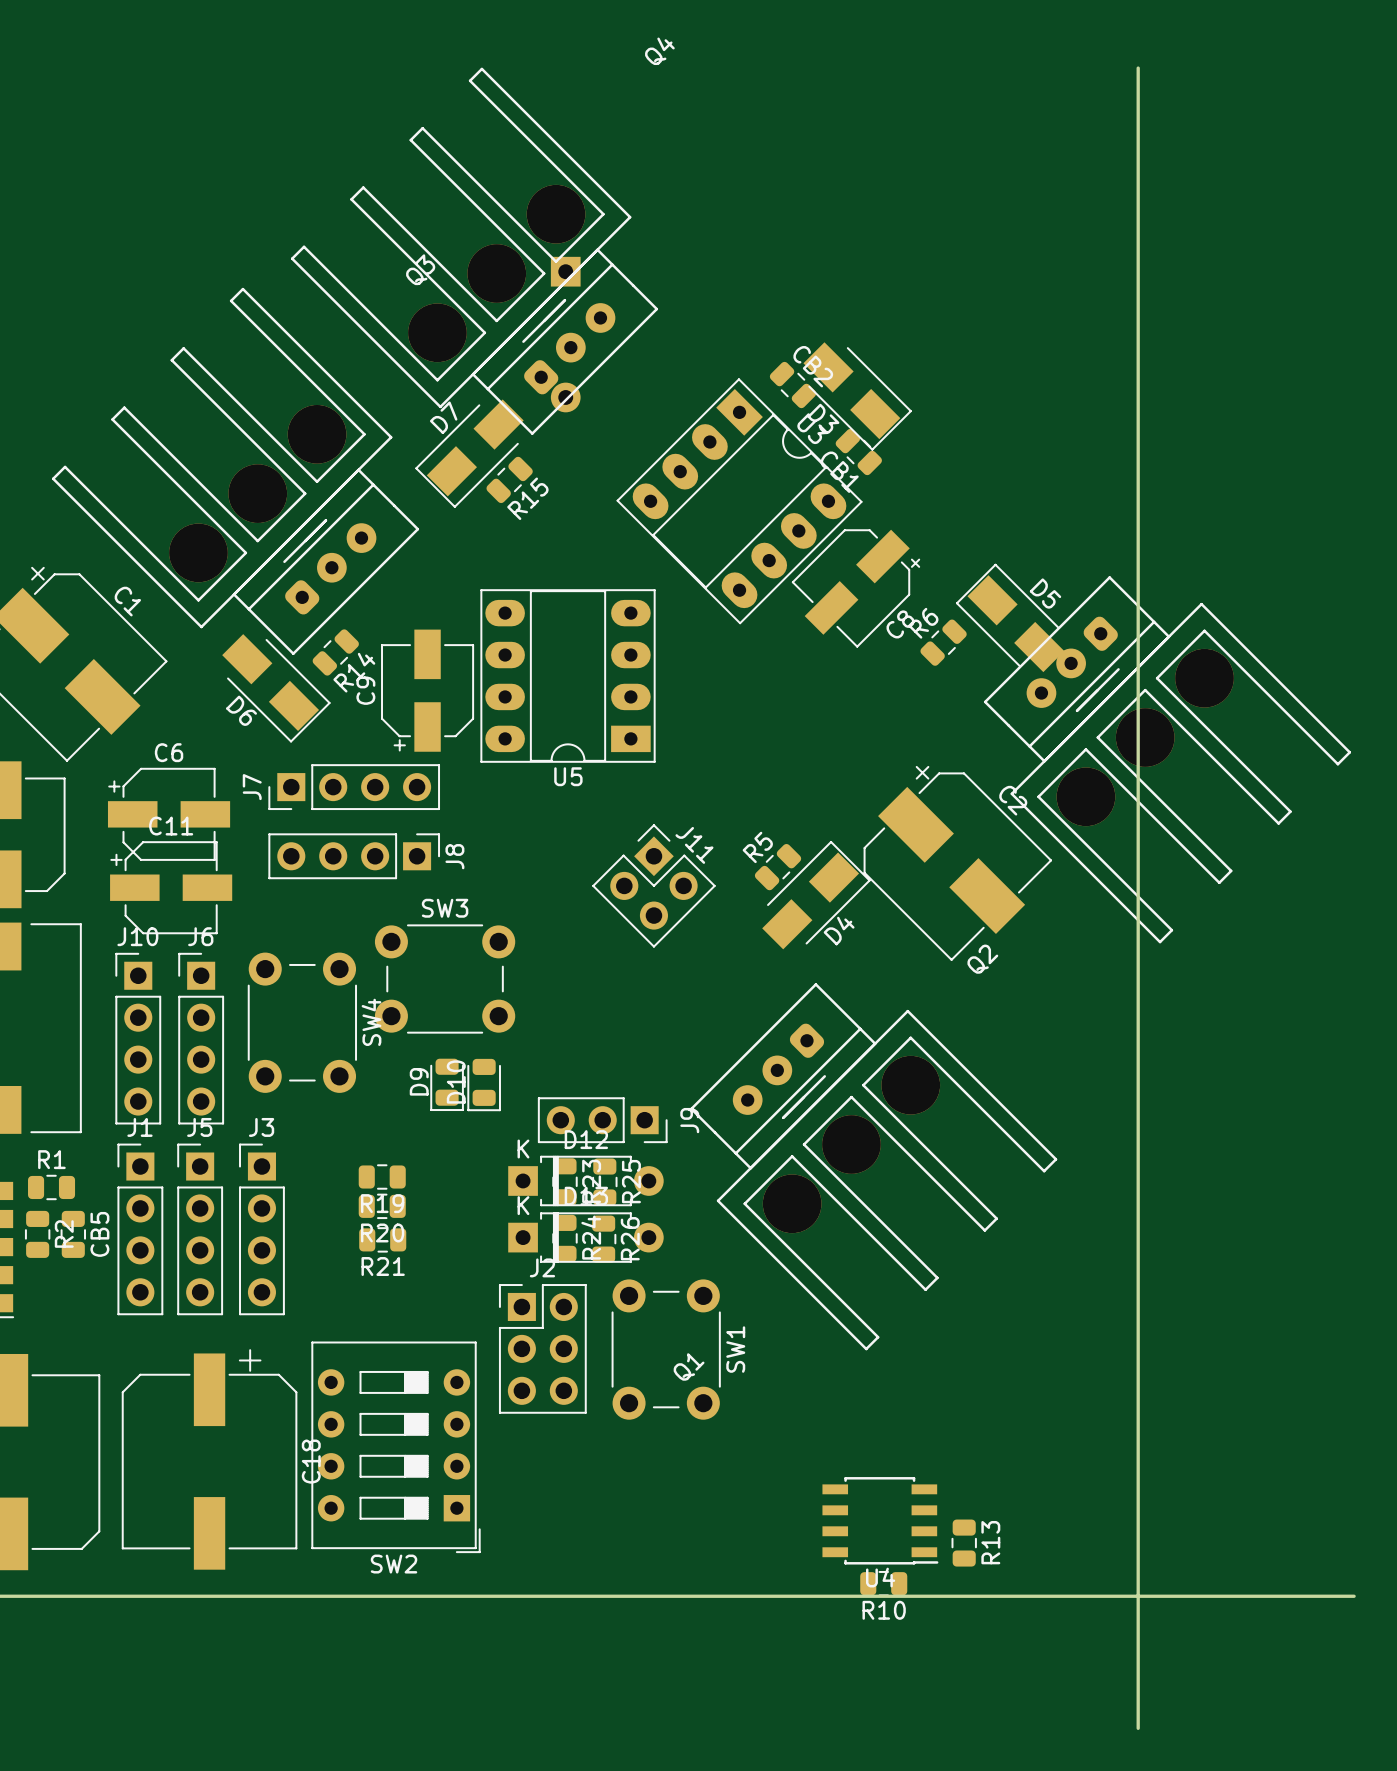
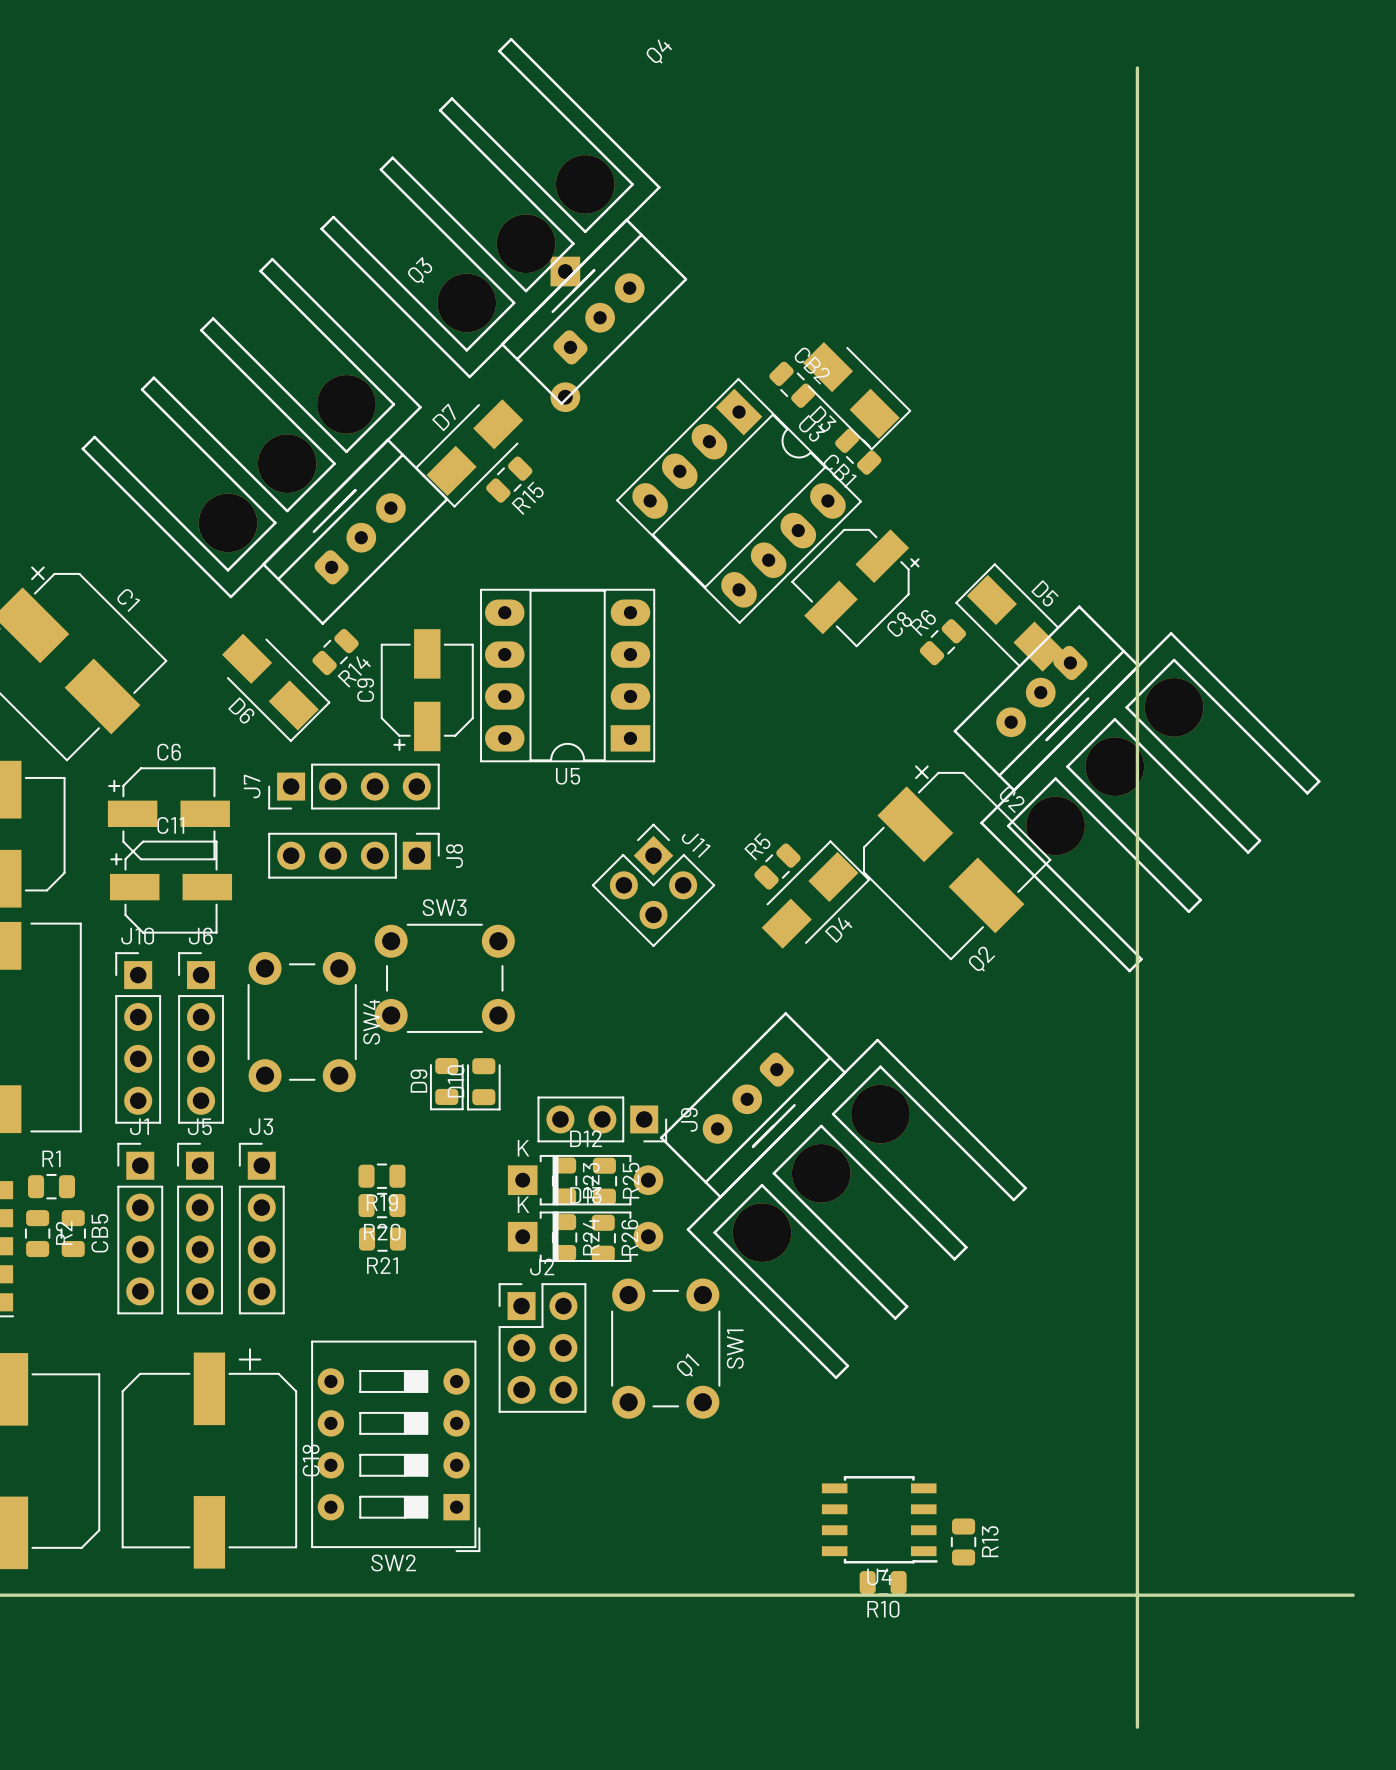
Q4 position: (474, 251) -> (503, 221)
Q3 position: (235, 471) -> (264, 441)
Q2 position: (1167, 759) -> (1137, 788)
Q1 position: (873, 1166) -> (843, 1195)

